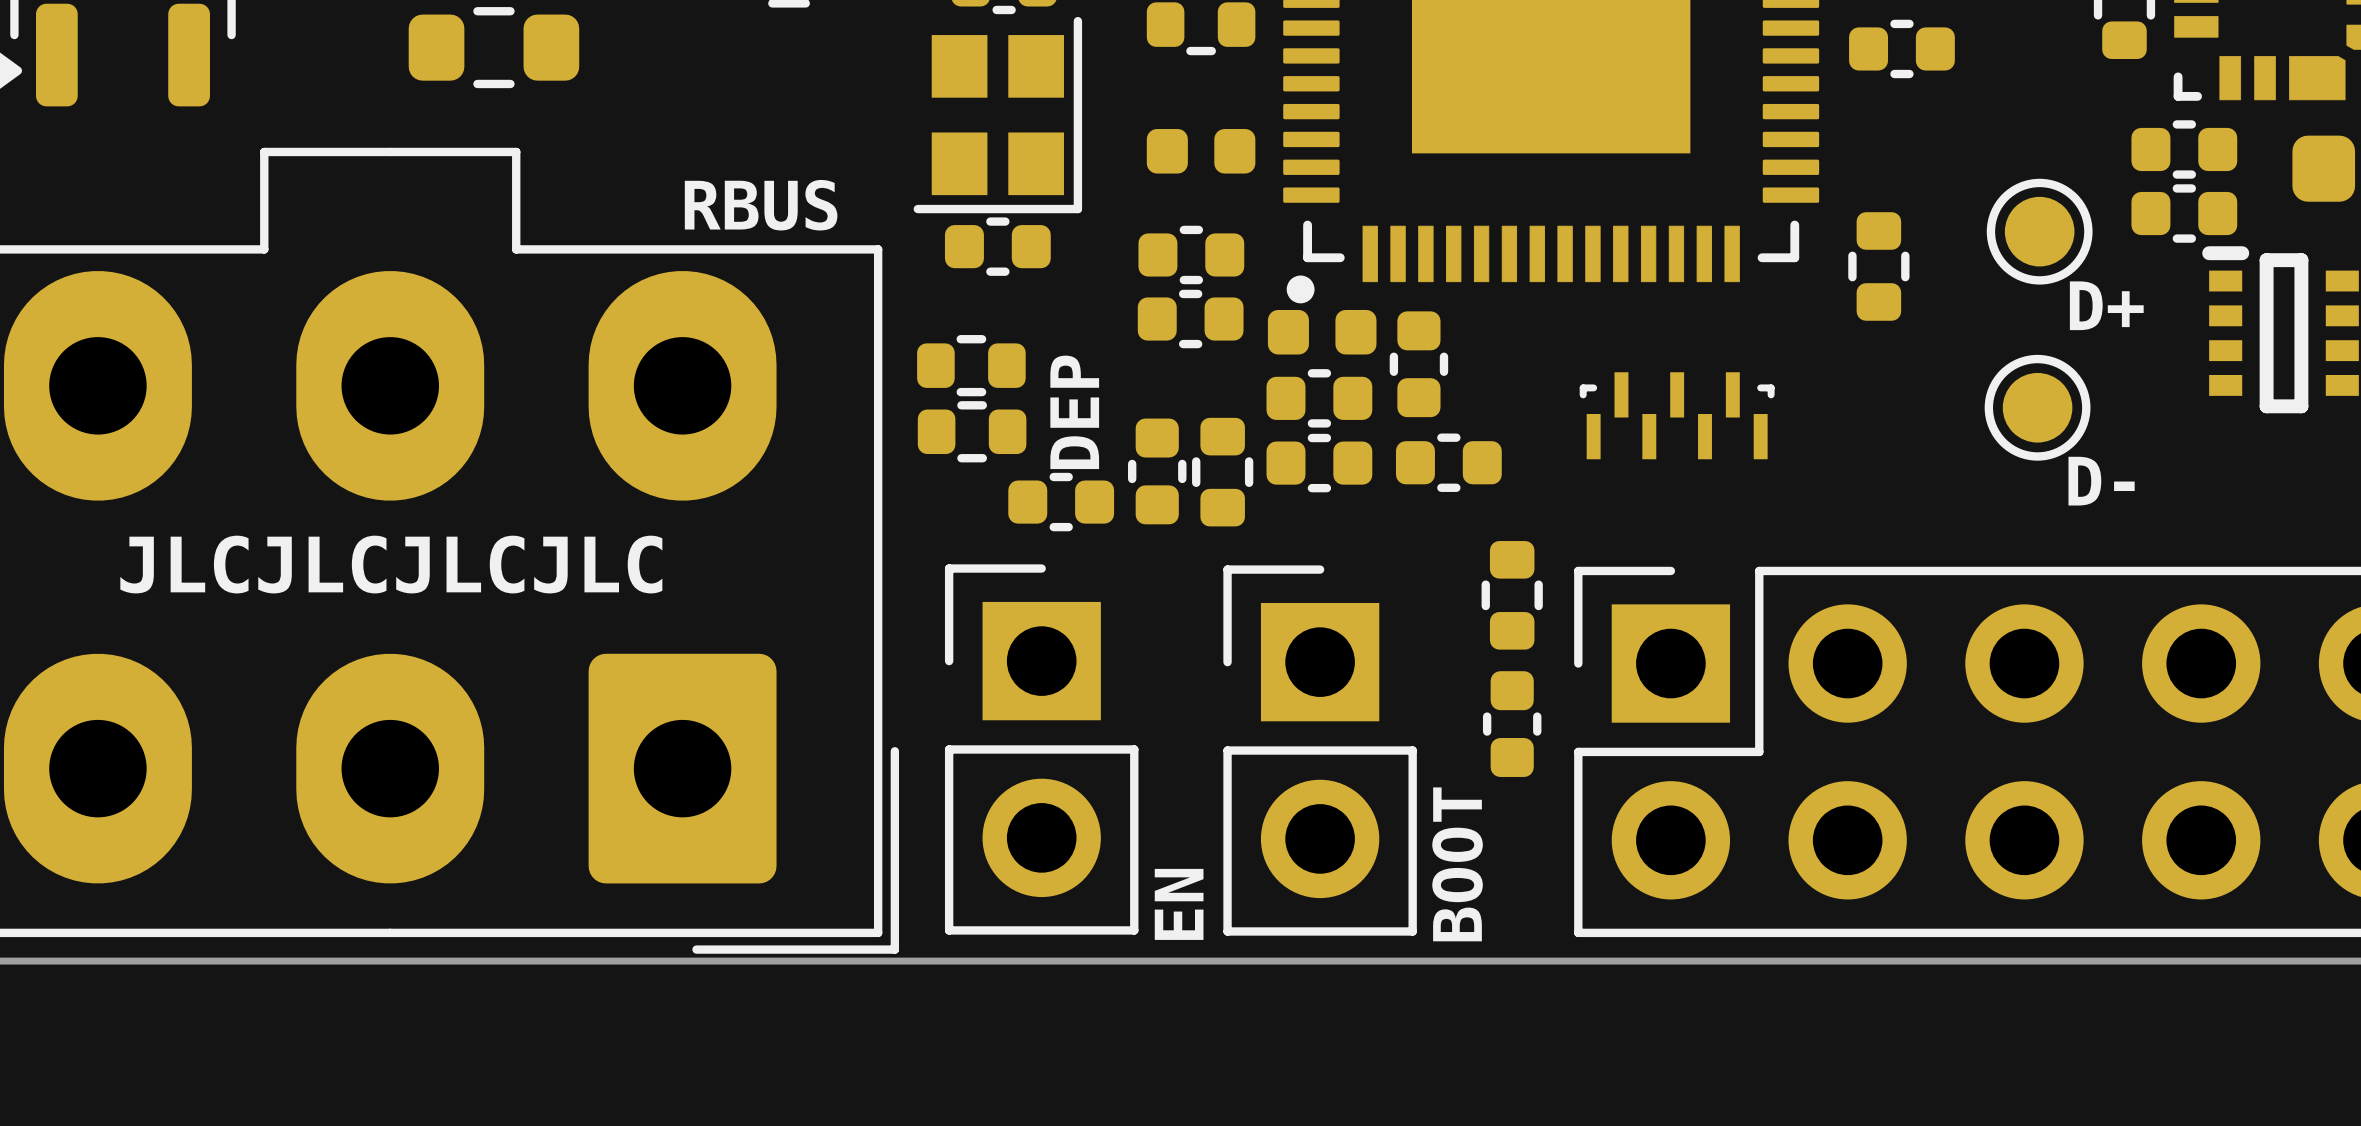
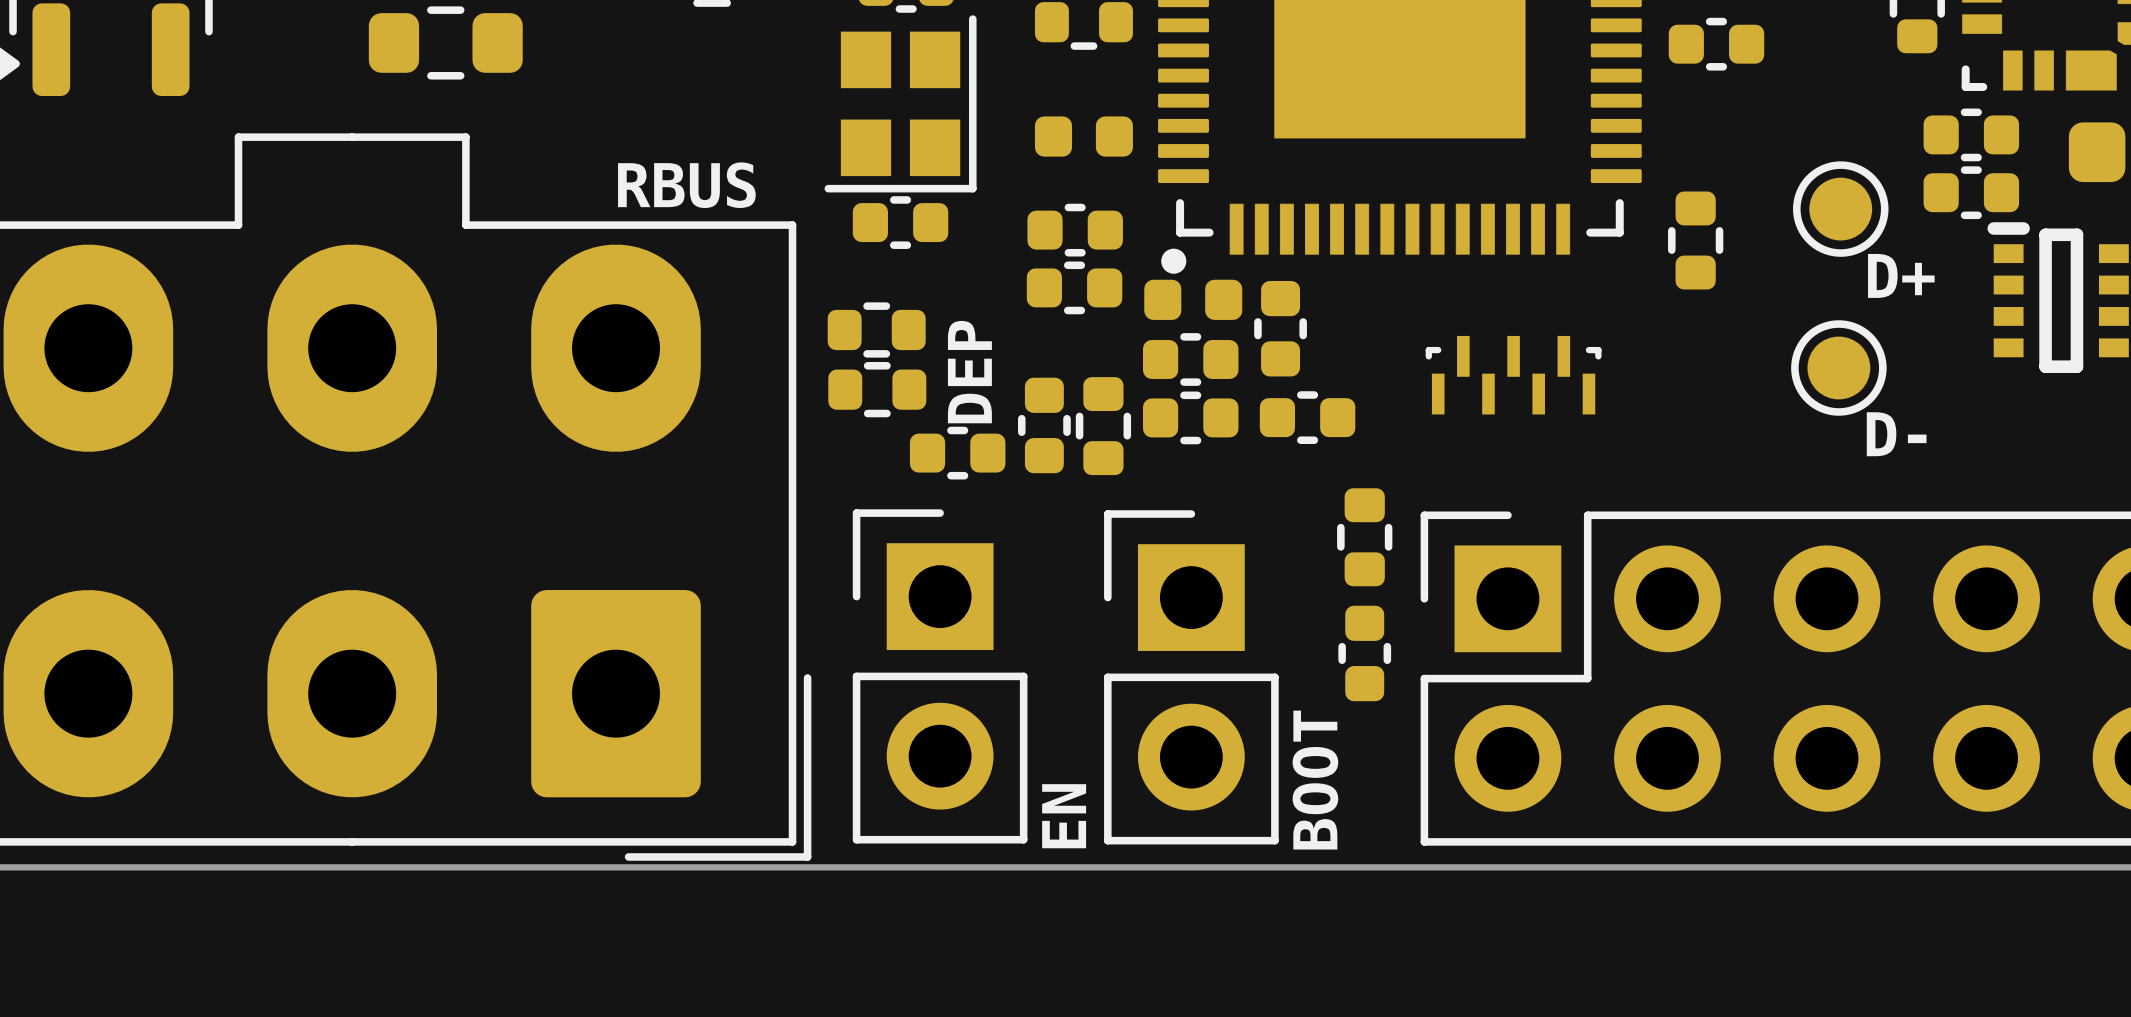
text: JLCJLCJLCJLC (391, 564) -> none

